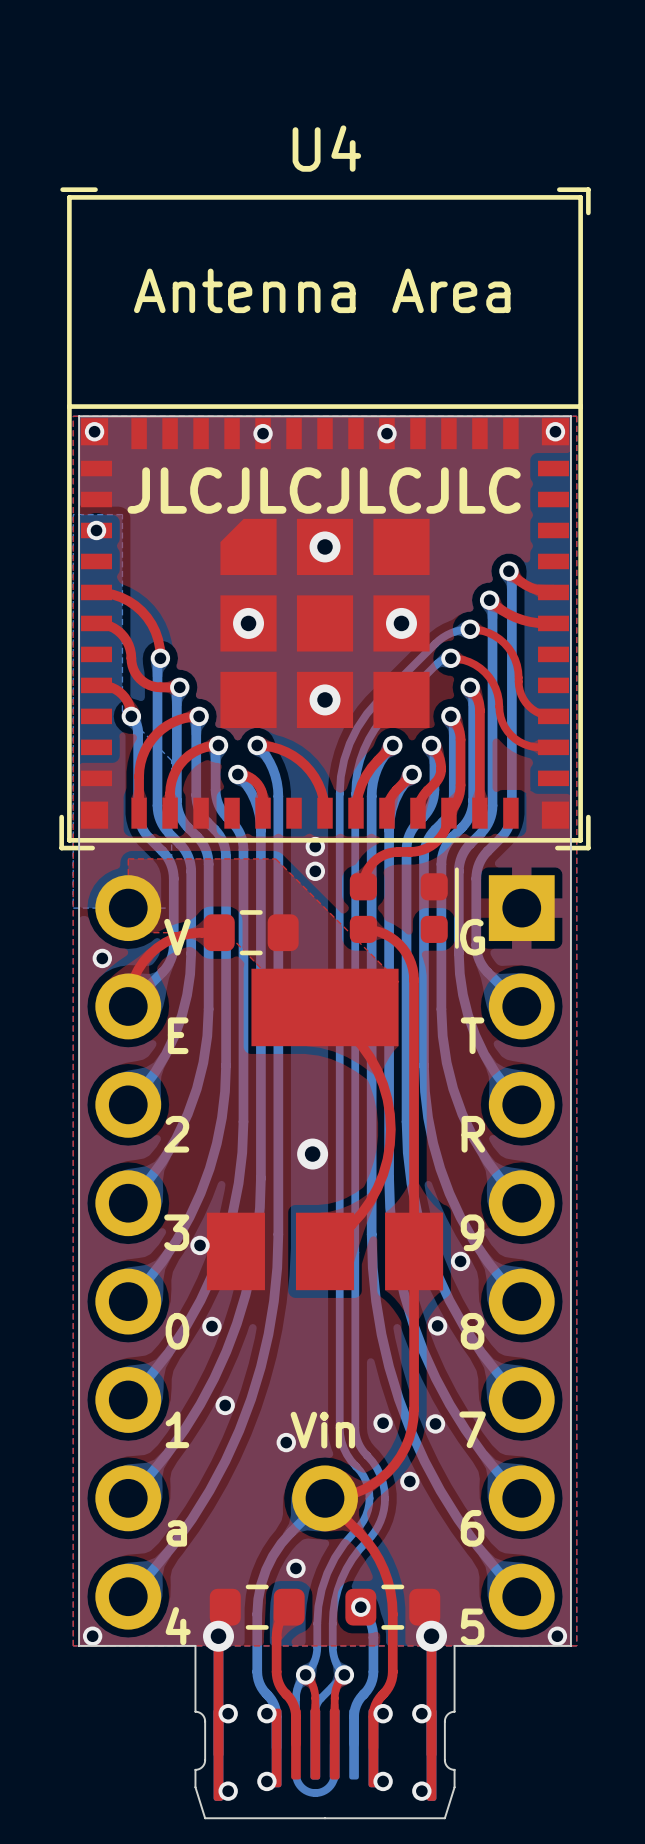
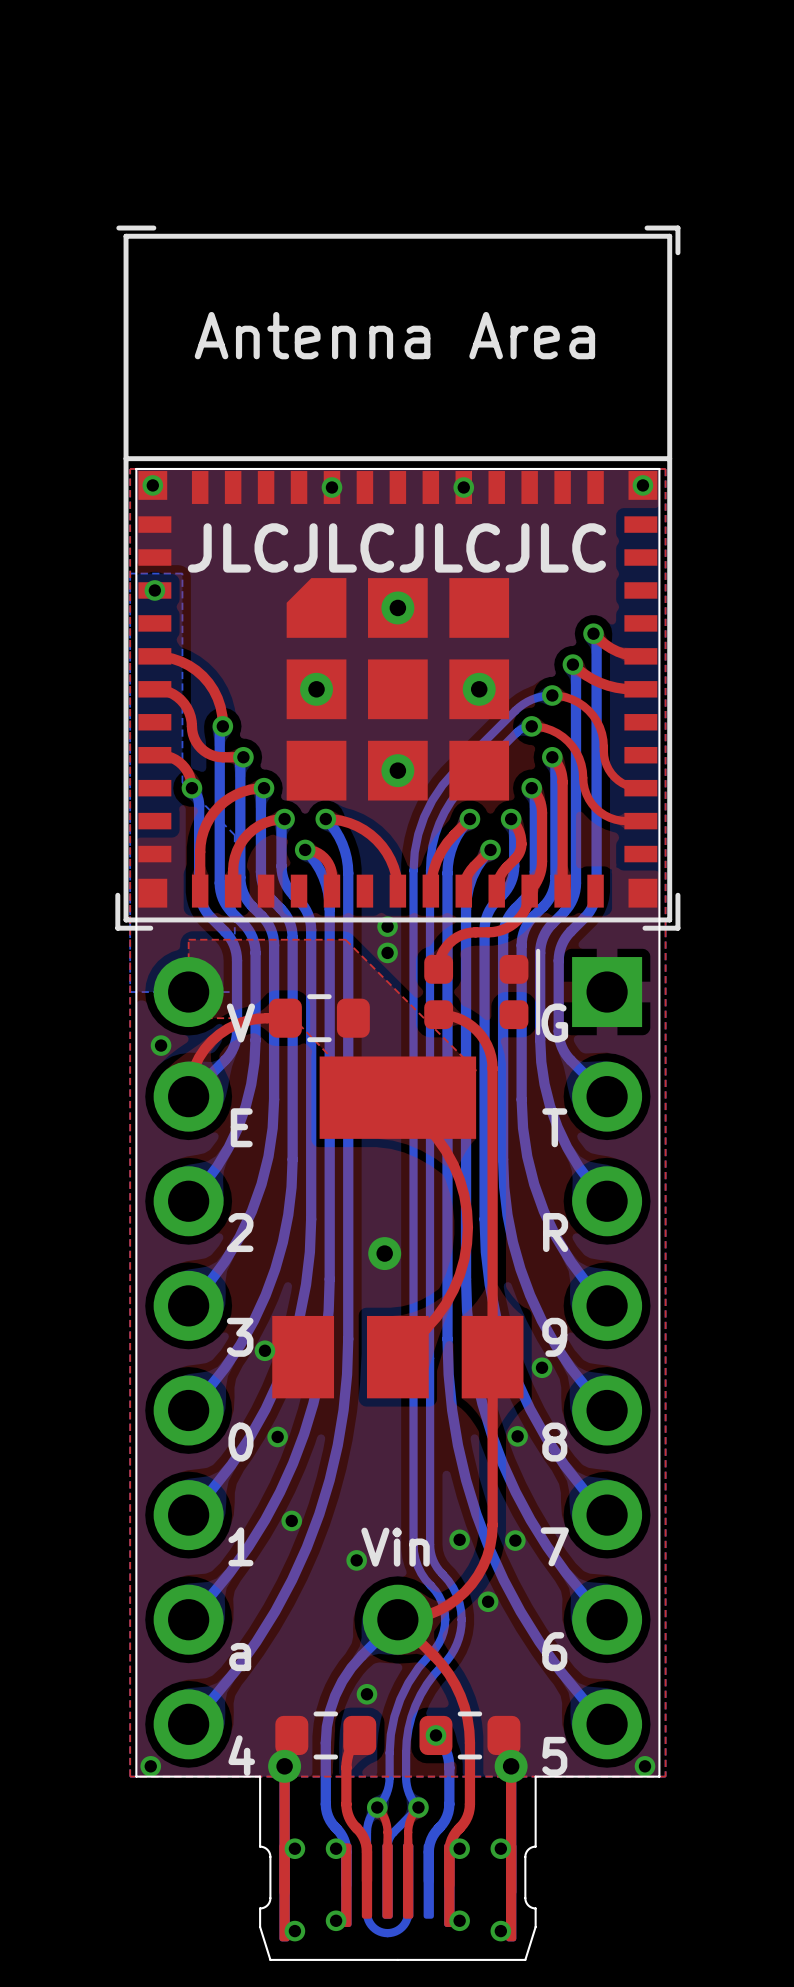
U4 name: U4 (326, 148) -> none

